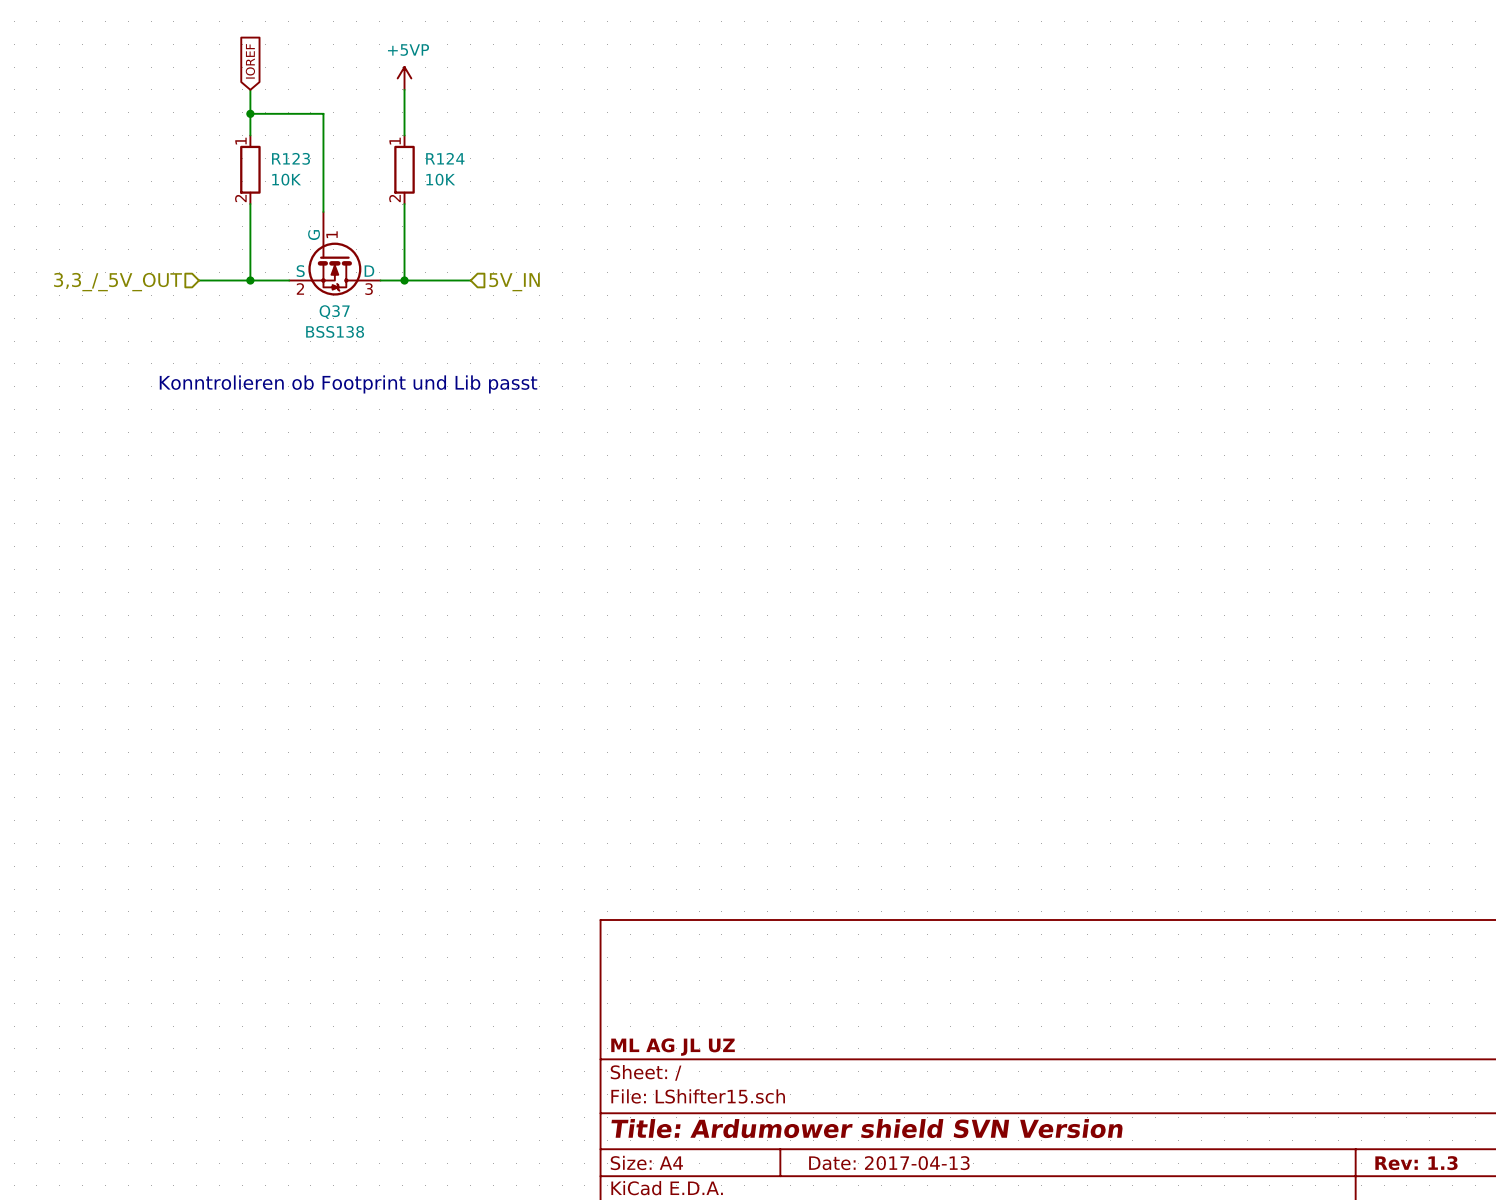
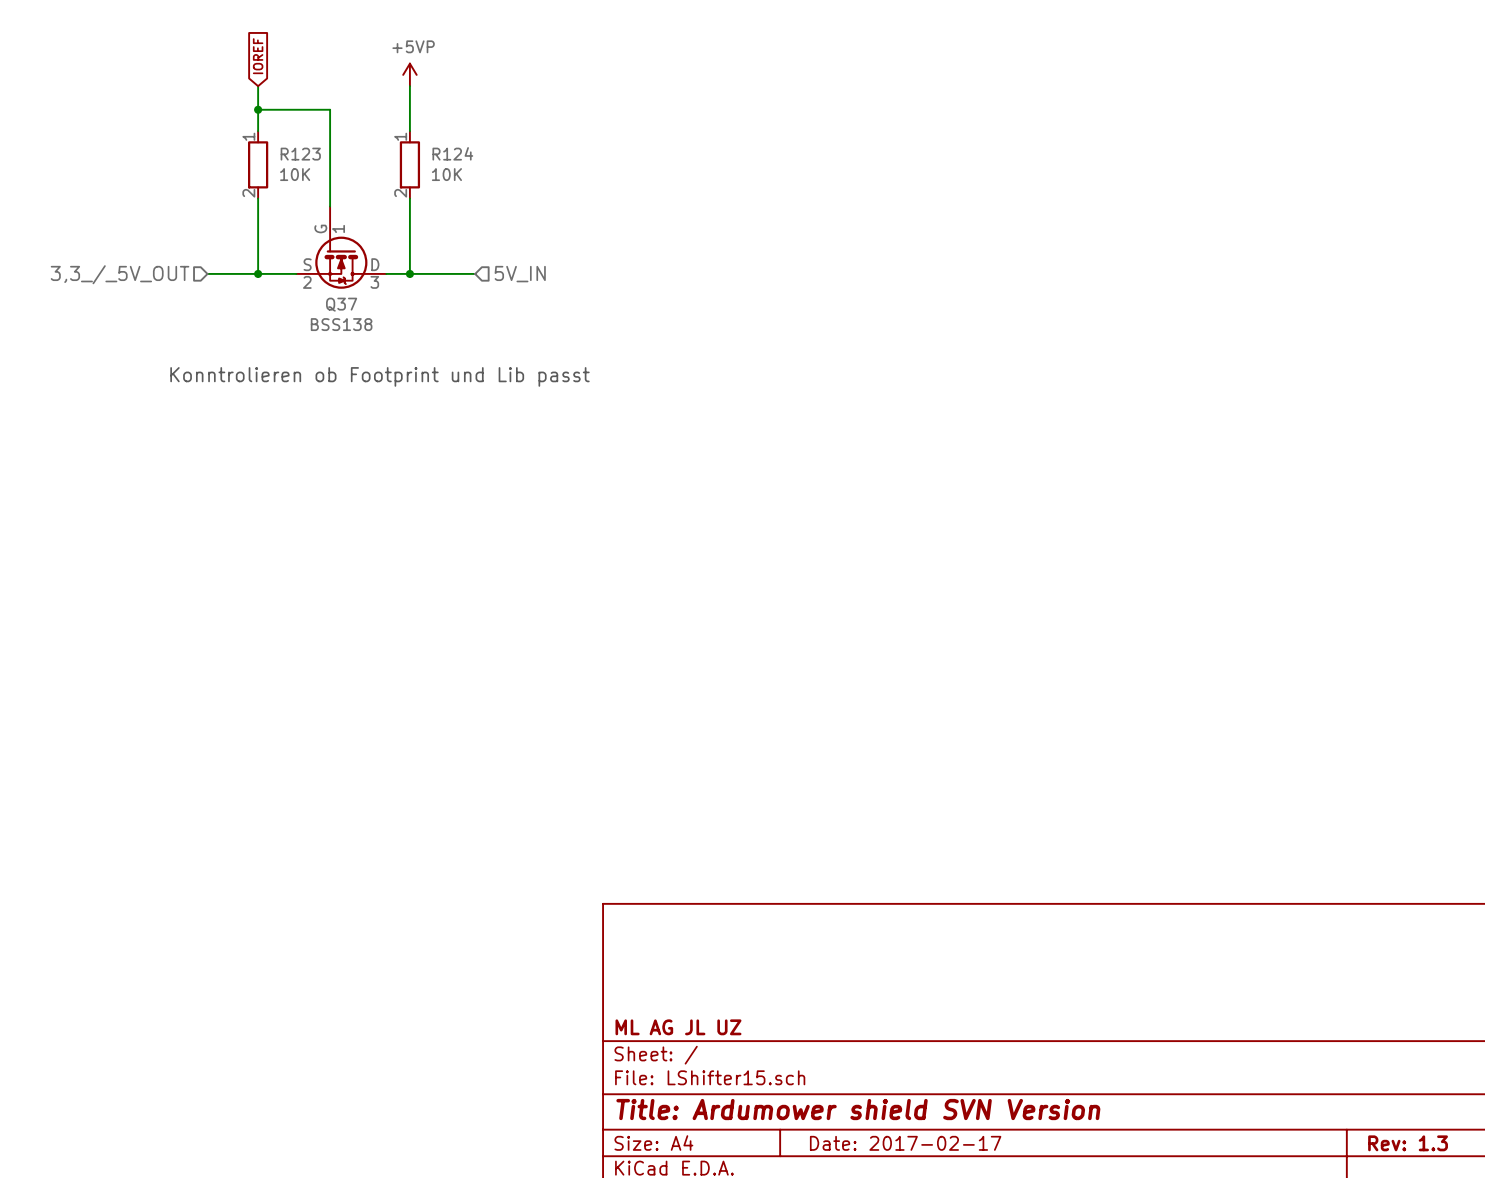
title block: Date: 2017-04-13 (889, 1163) -> Date: 2017-02-17 (905, 1143)

